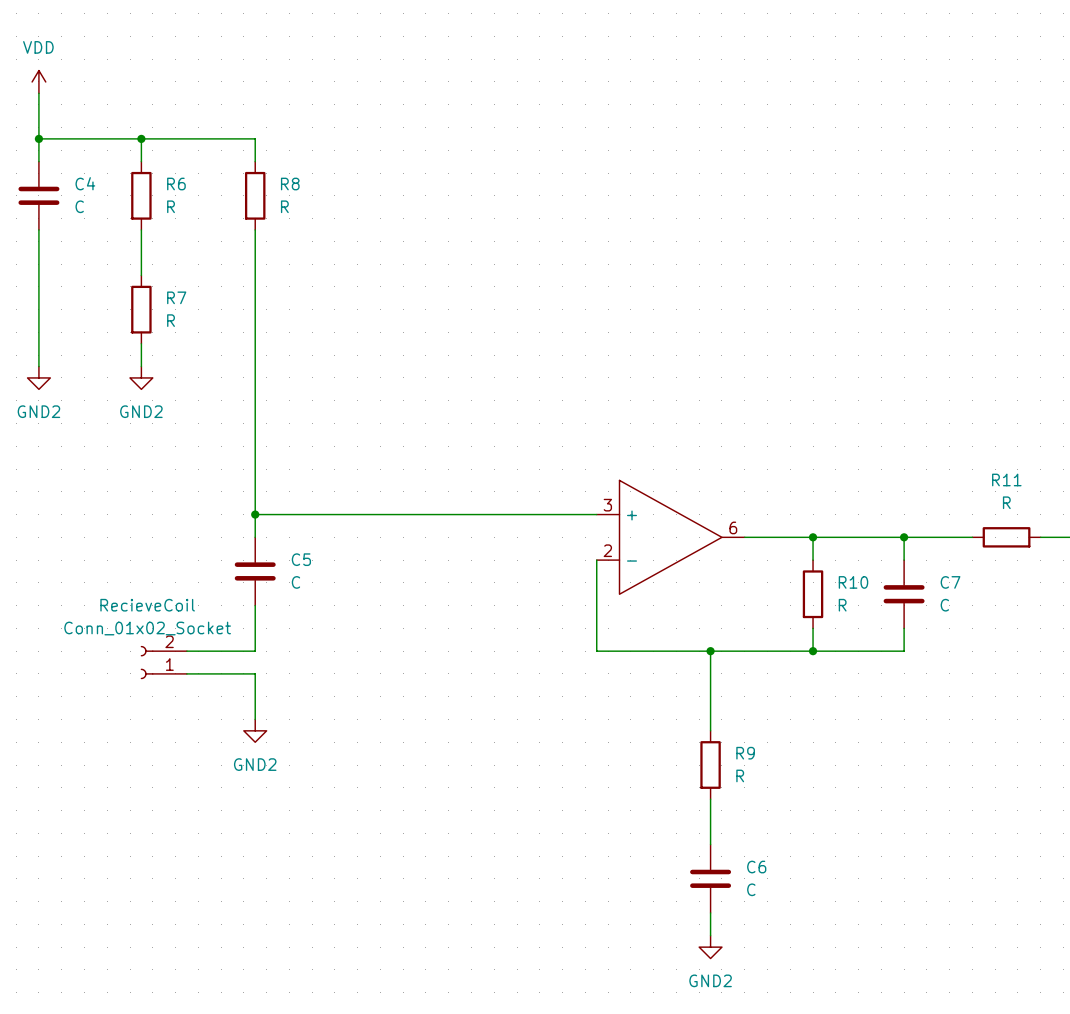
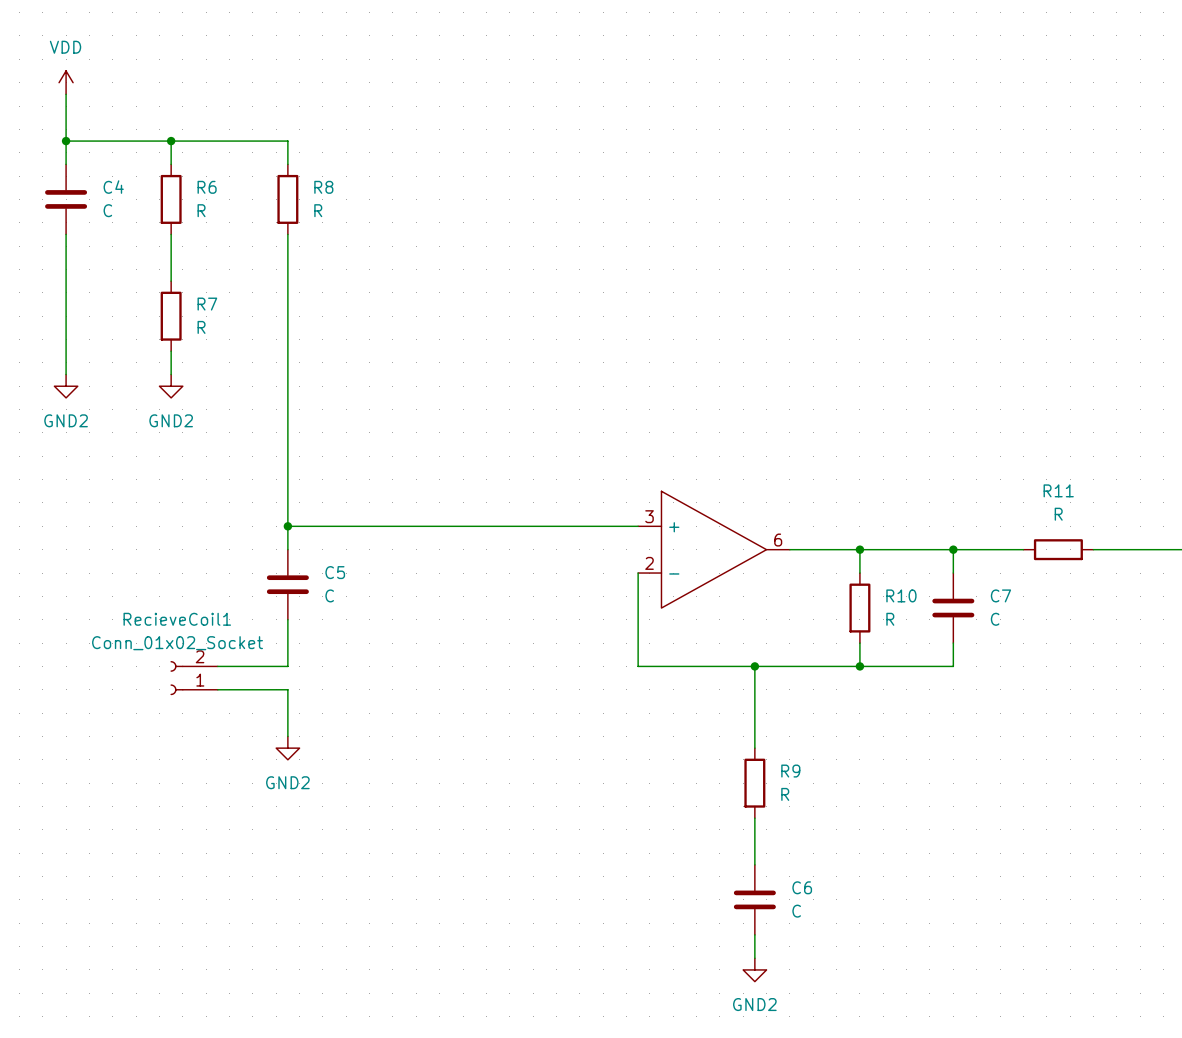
RecieveCoil name: RecieveCoil (147, 605) -> RecieveCoil1 (177, 619)

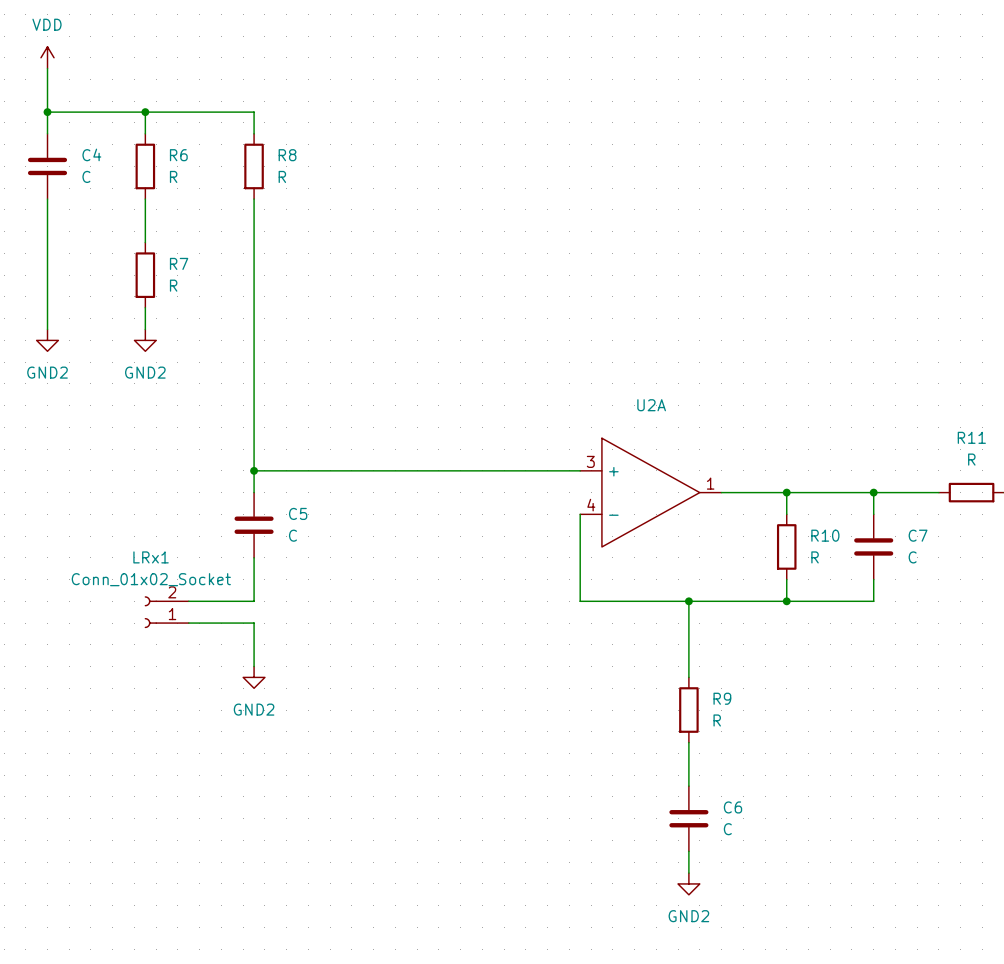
U2A name: none -> U2A (651, 405)
U2A pin number: 6 (778, 540) -> 1 (710, 483)
U2A pin number: 2 (649, 563) -> 4 (591, 505)
RecieveCoil1 name: RecieveCoil1 (177, 619) -> LRx1 (151, 557)

